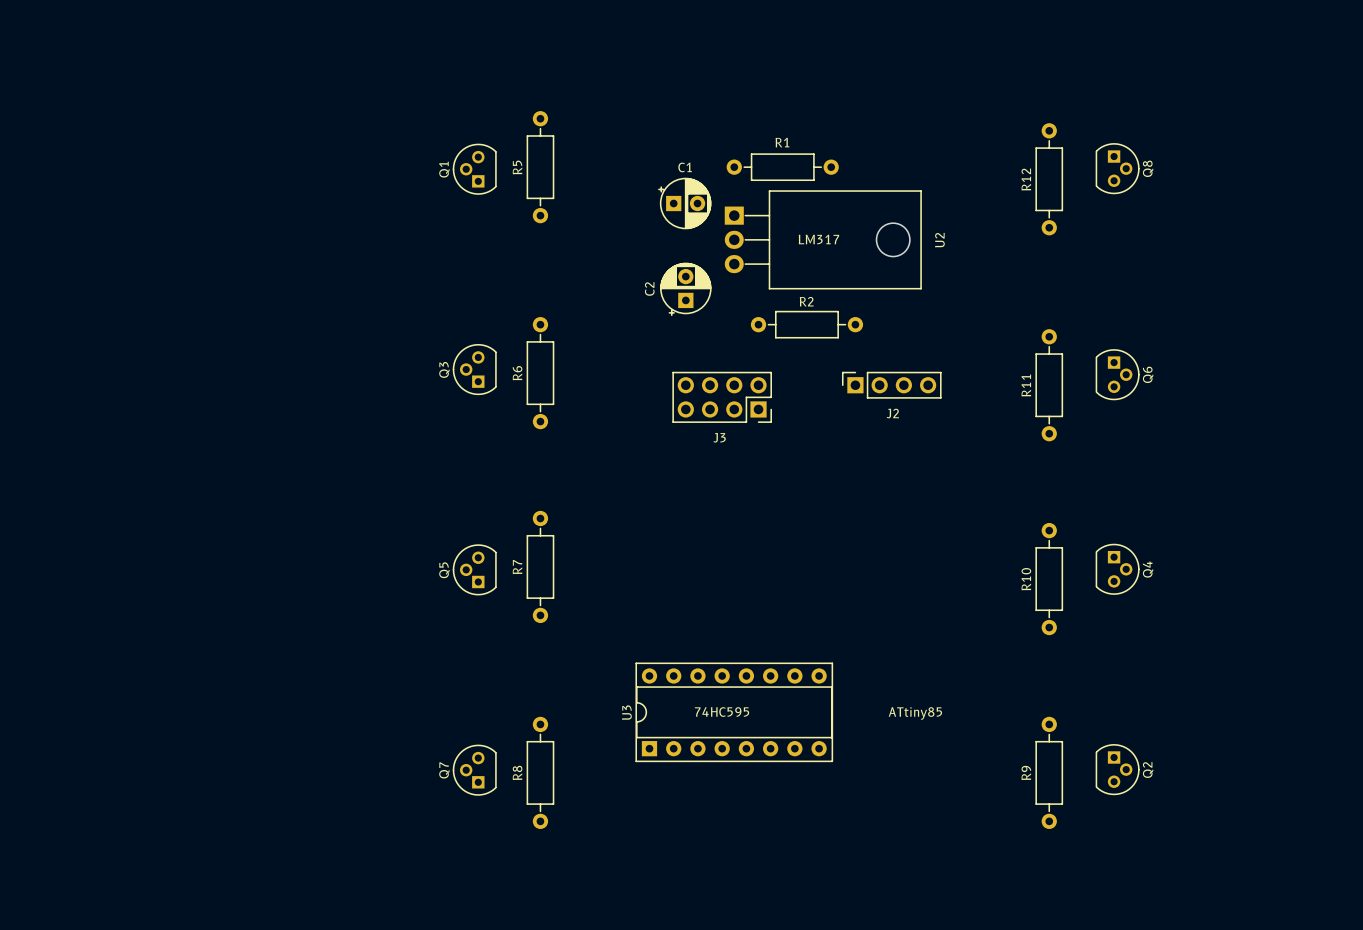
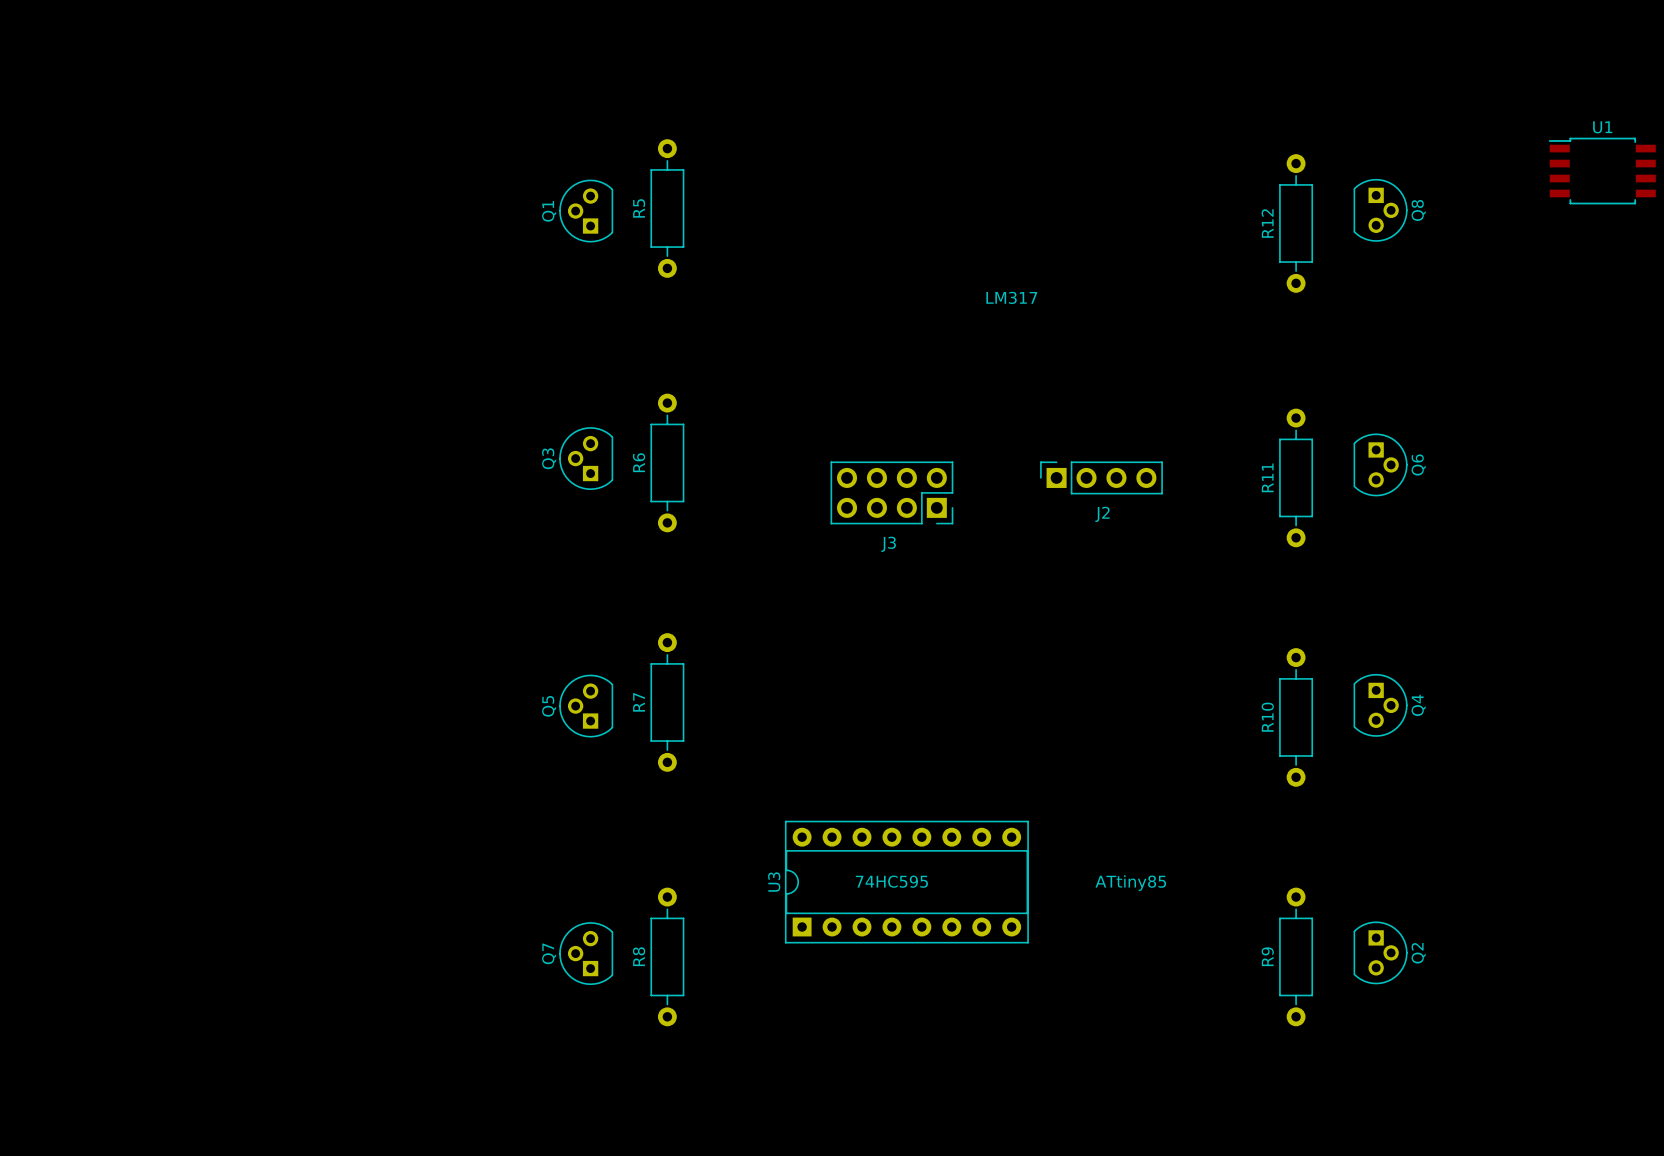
U1: none -> (1602, 171)
R1: (782, 167) -> none
C1: (684, 203) -> none
U2: (823, 239) -> none
C2: (685, 289) -> none
R2: (806, 324) -> none

